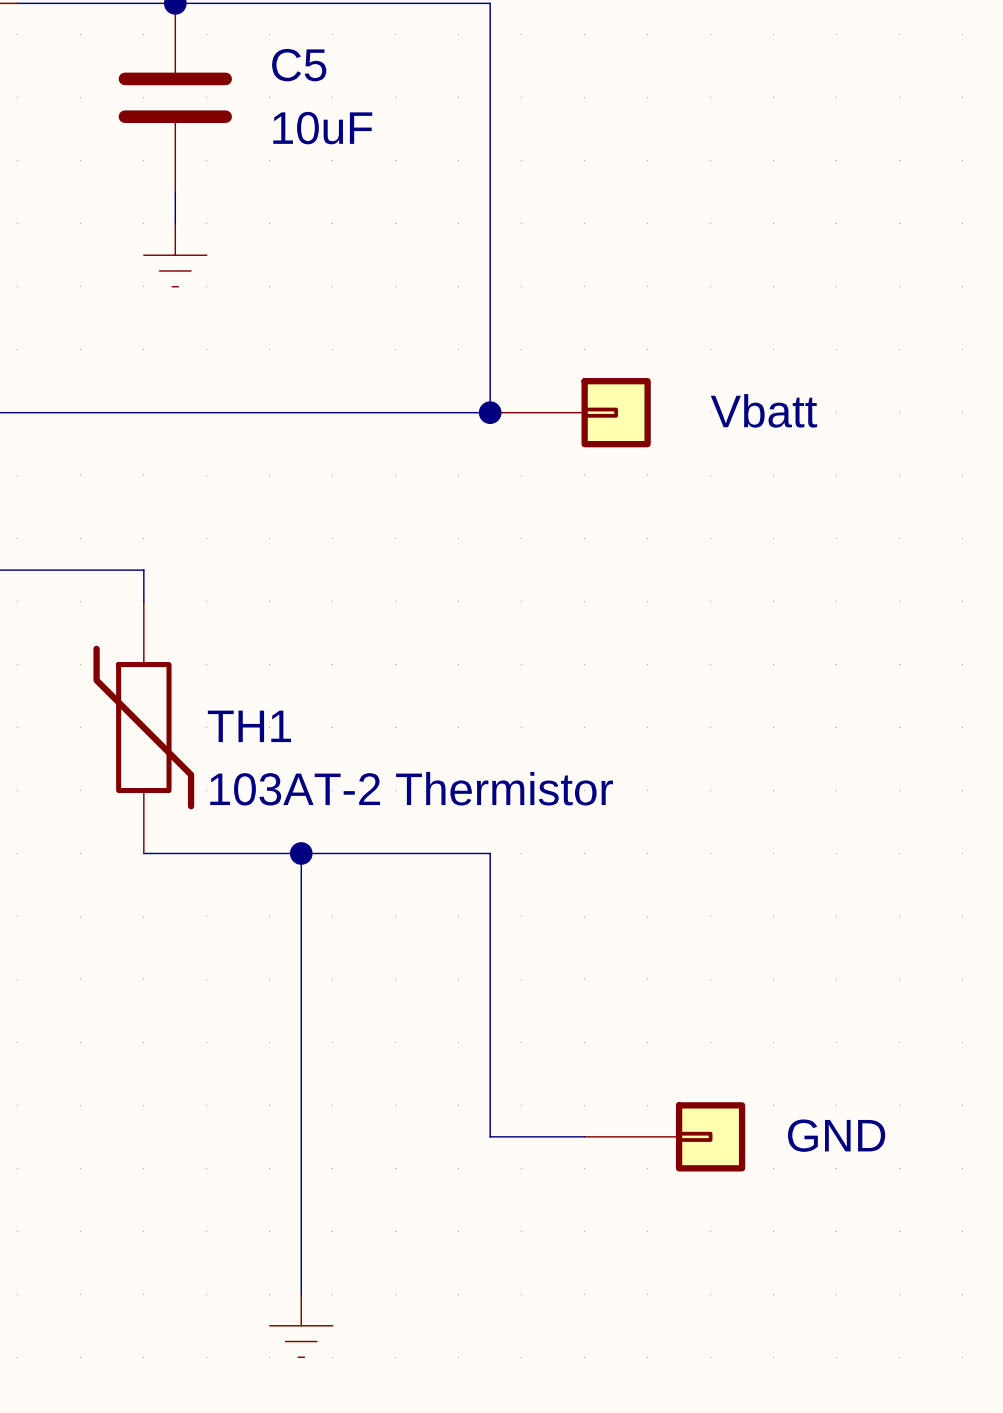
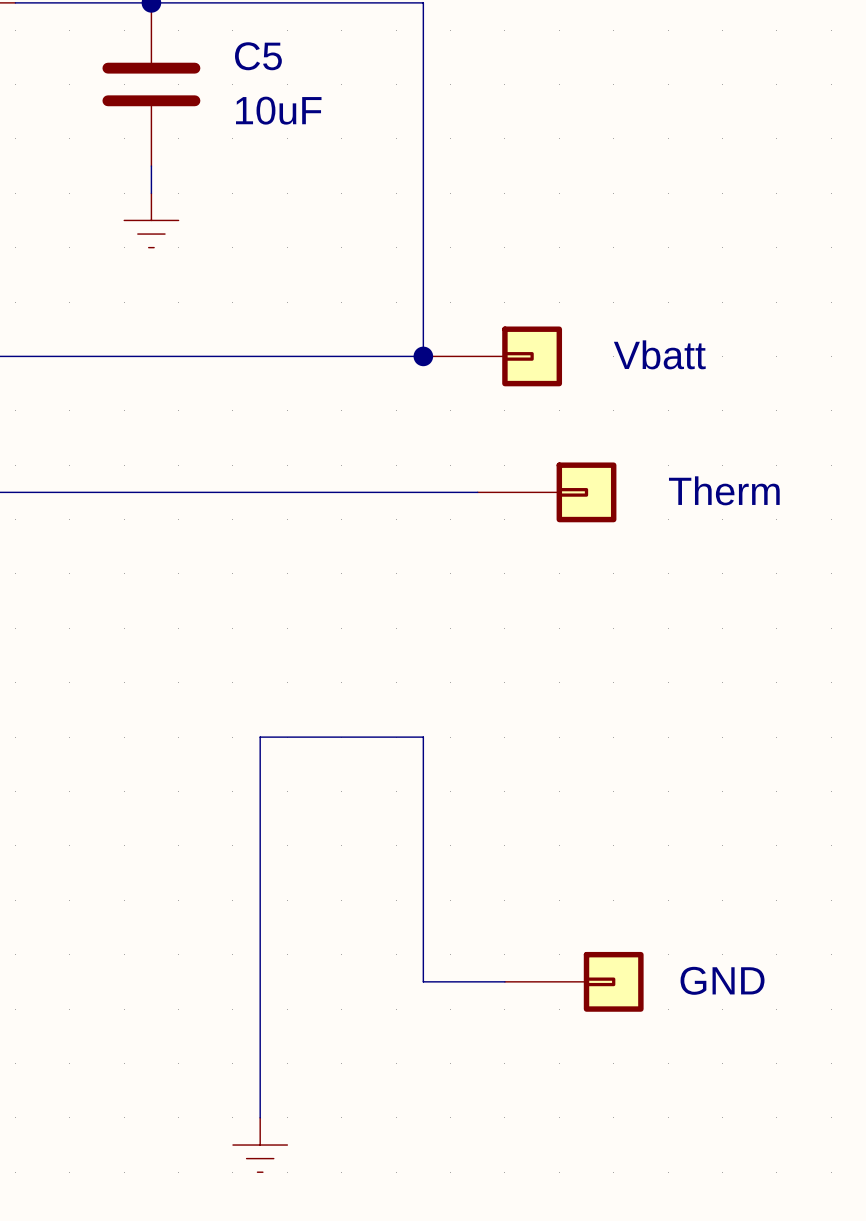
wire: (143, 570) (143, 601) -> (124, 492) (477, 492)
part: none -> Therm (547, 492)
TH1: 103AT-2 Thermistor (143, 727) -> none
wire: (143, 853) (301, 853) -> none
junction: (301, 853) -> none

